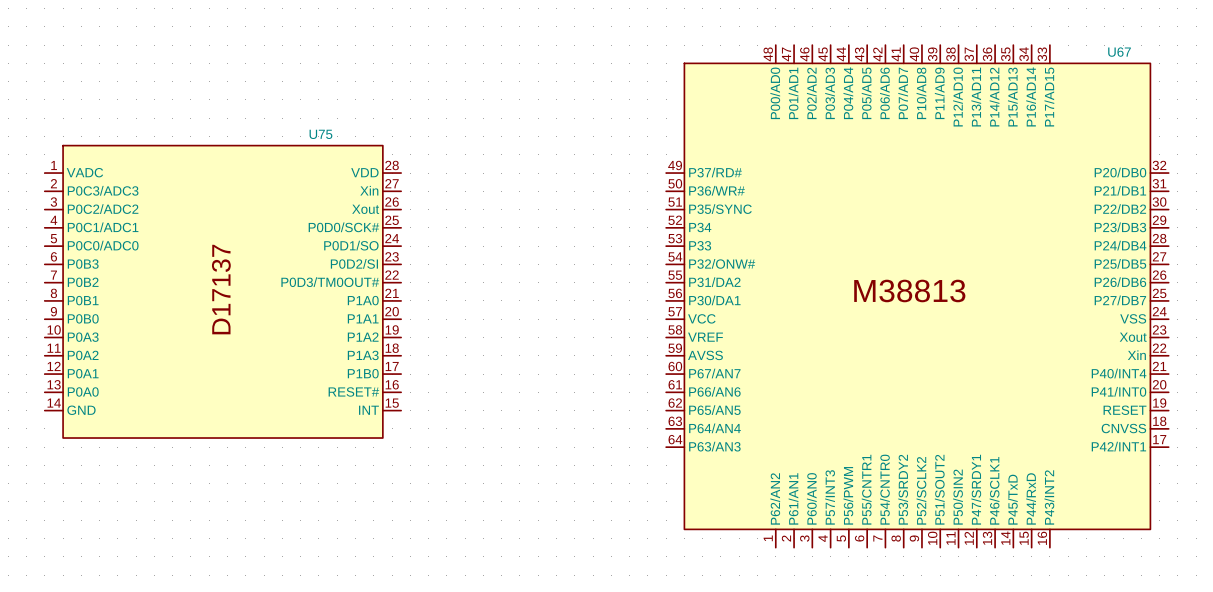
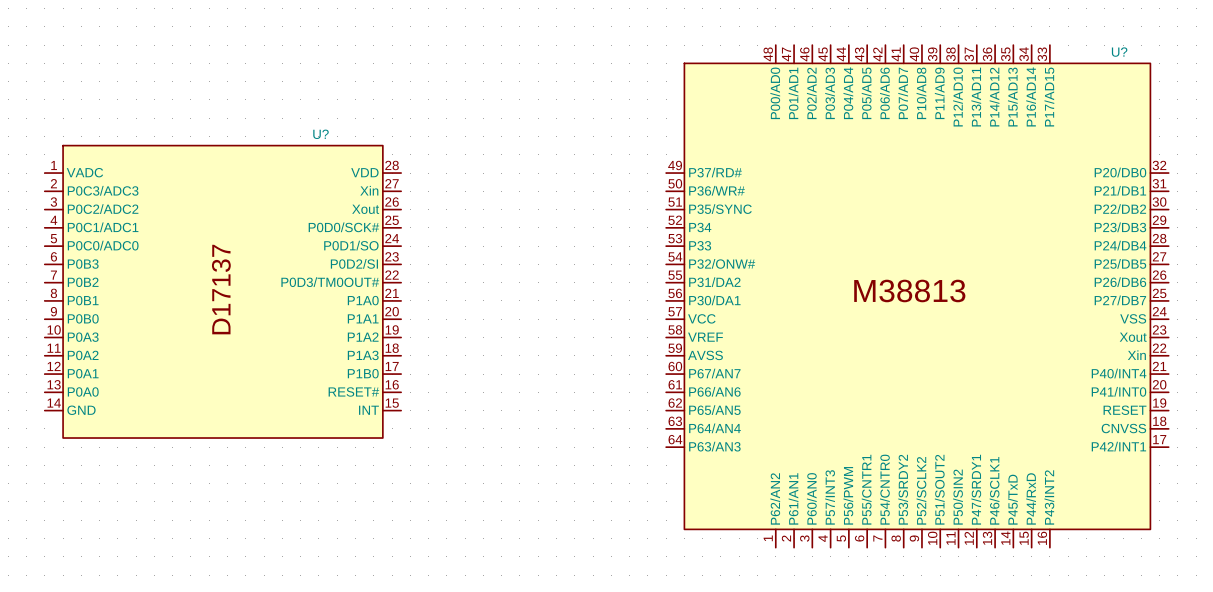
U67 name: U67 (1119, 52) -> U? (1119, 52)
U75 name: U75 (320, 134) -> U? (321, 134)

